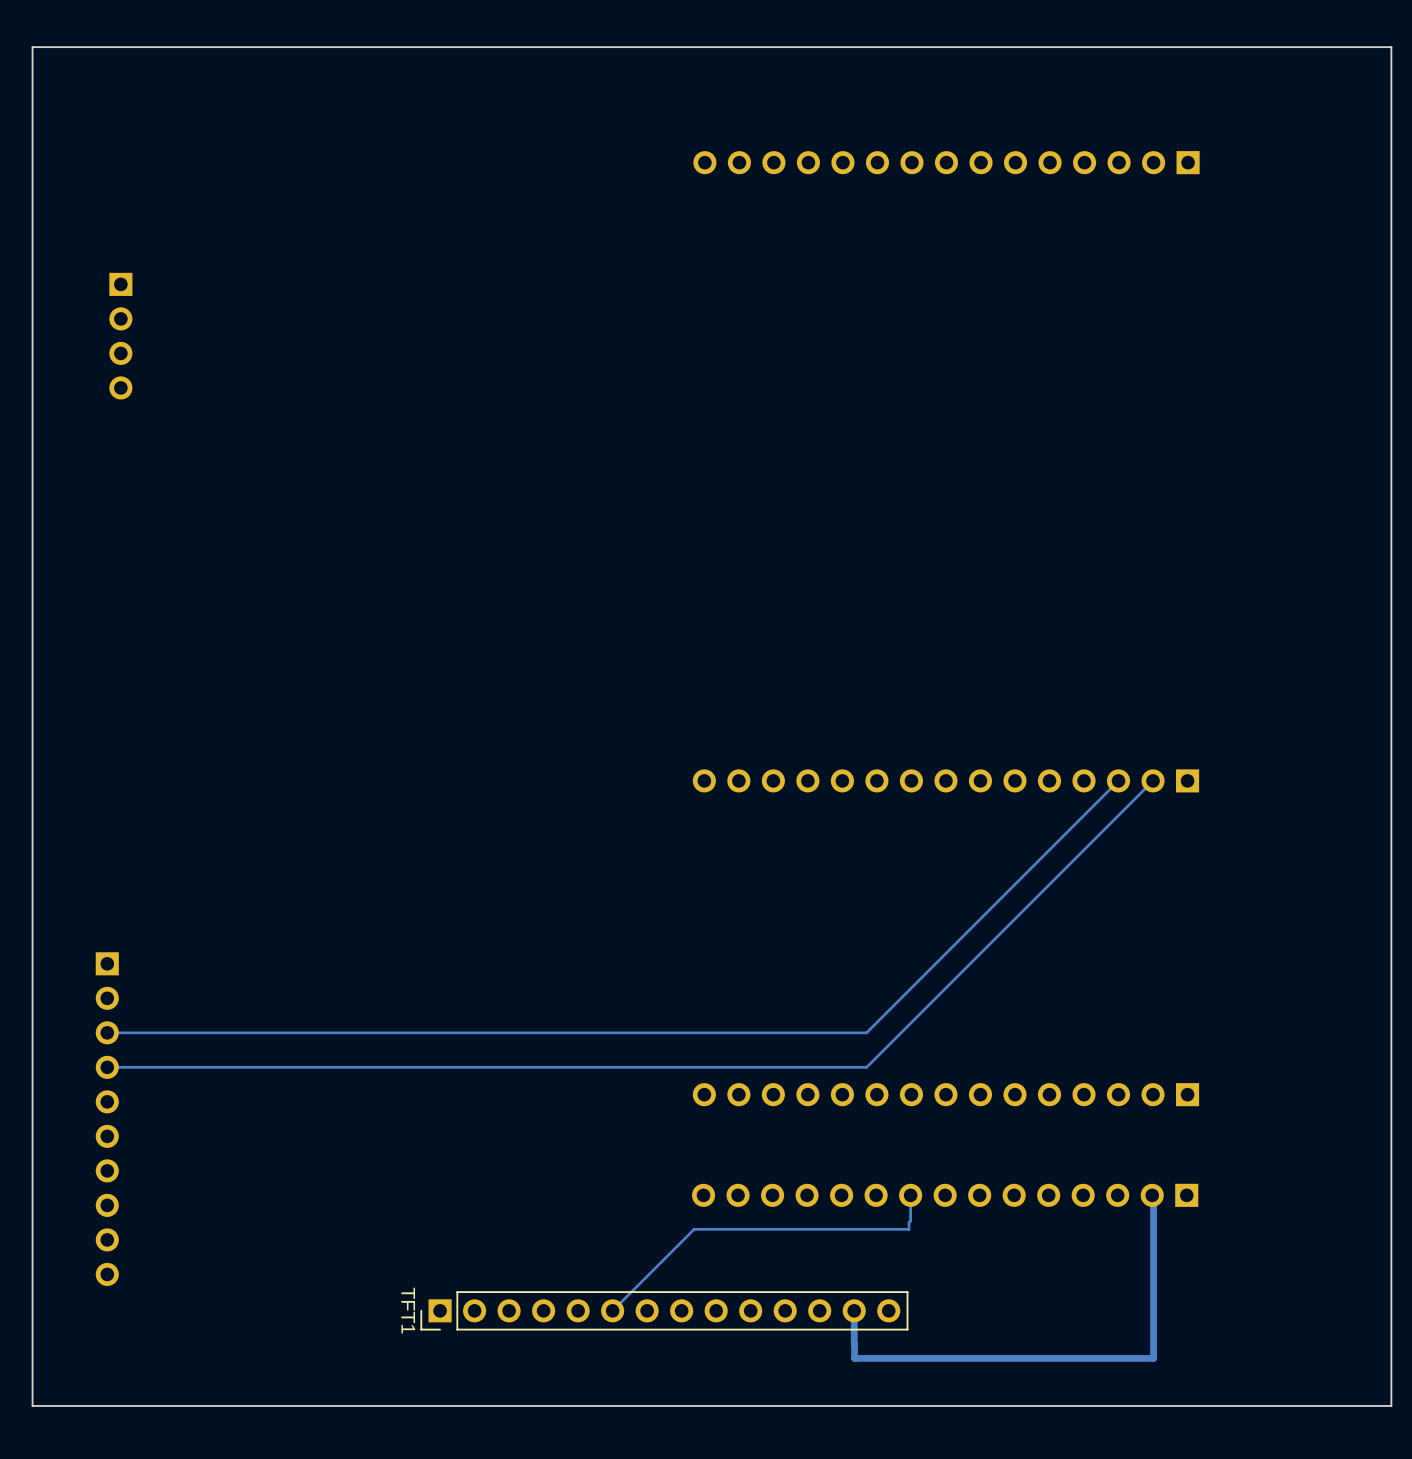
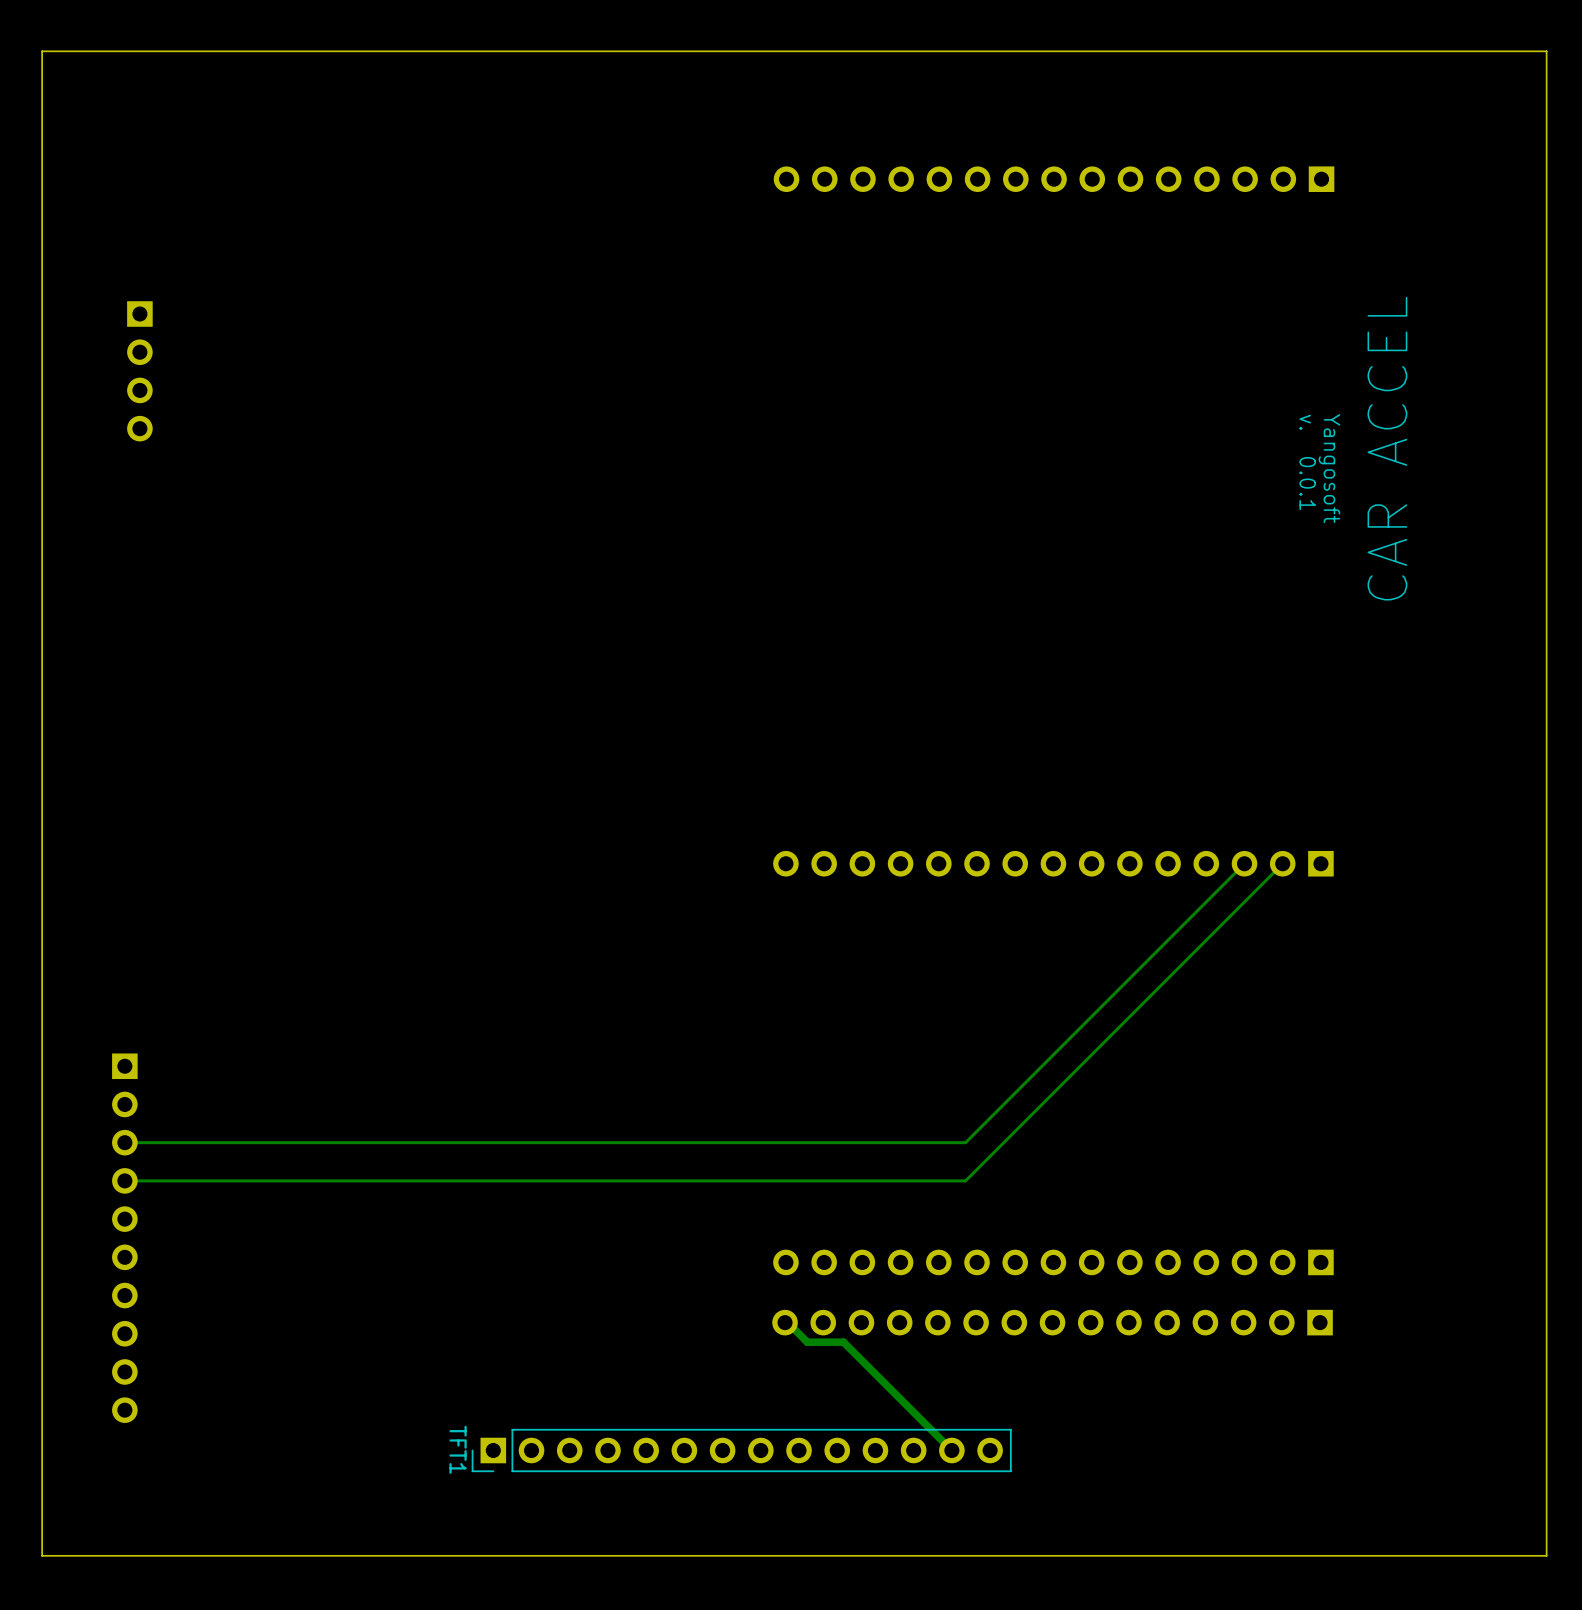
text: none -> CAR ACCEL (1387, 448)
text: none -> v. 0.0.1 (1307, 462)
text: none -> Yangosoft (1329, 468)
part position: (945, 1094) -> (1053, 1262)
track: (910, 1195) (908, 1229) (694, 1229) (612, 1310) -> none
track: (1152, 1195) (1153, 1358) (854, 1358) (854, 1310) -> (787, 1322) (807, 1342) (843, 1342) (951, 1450)

